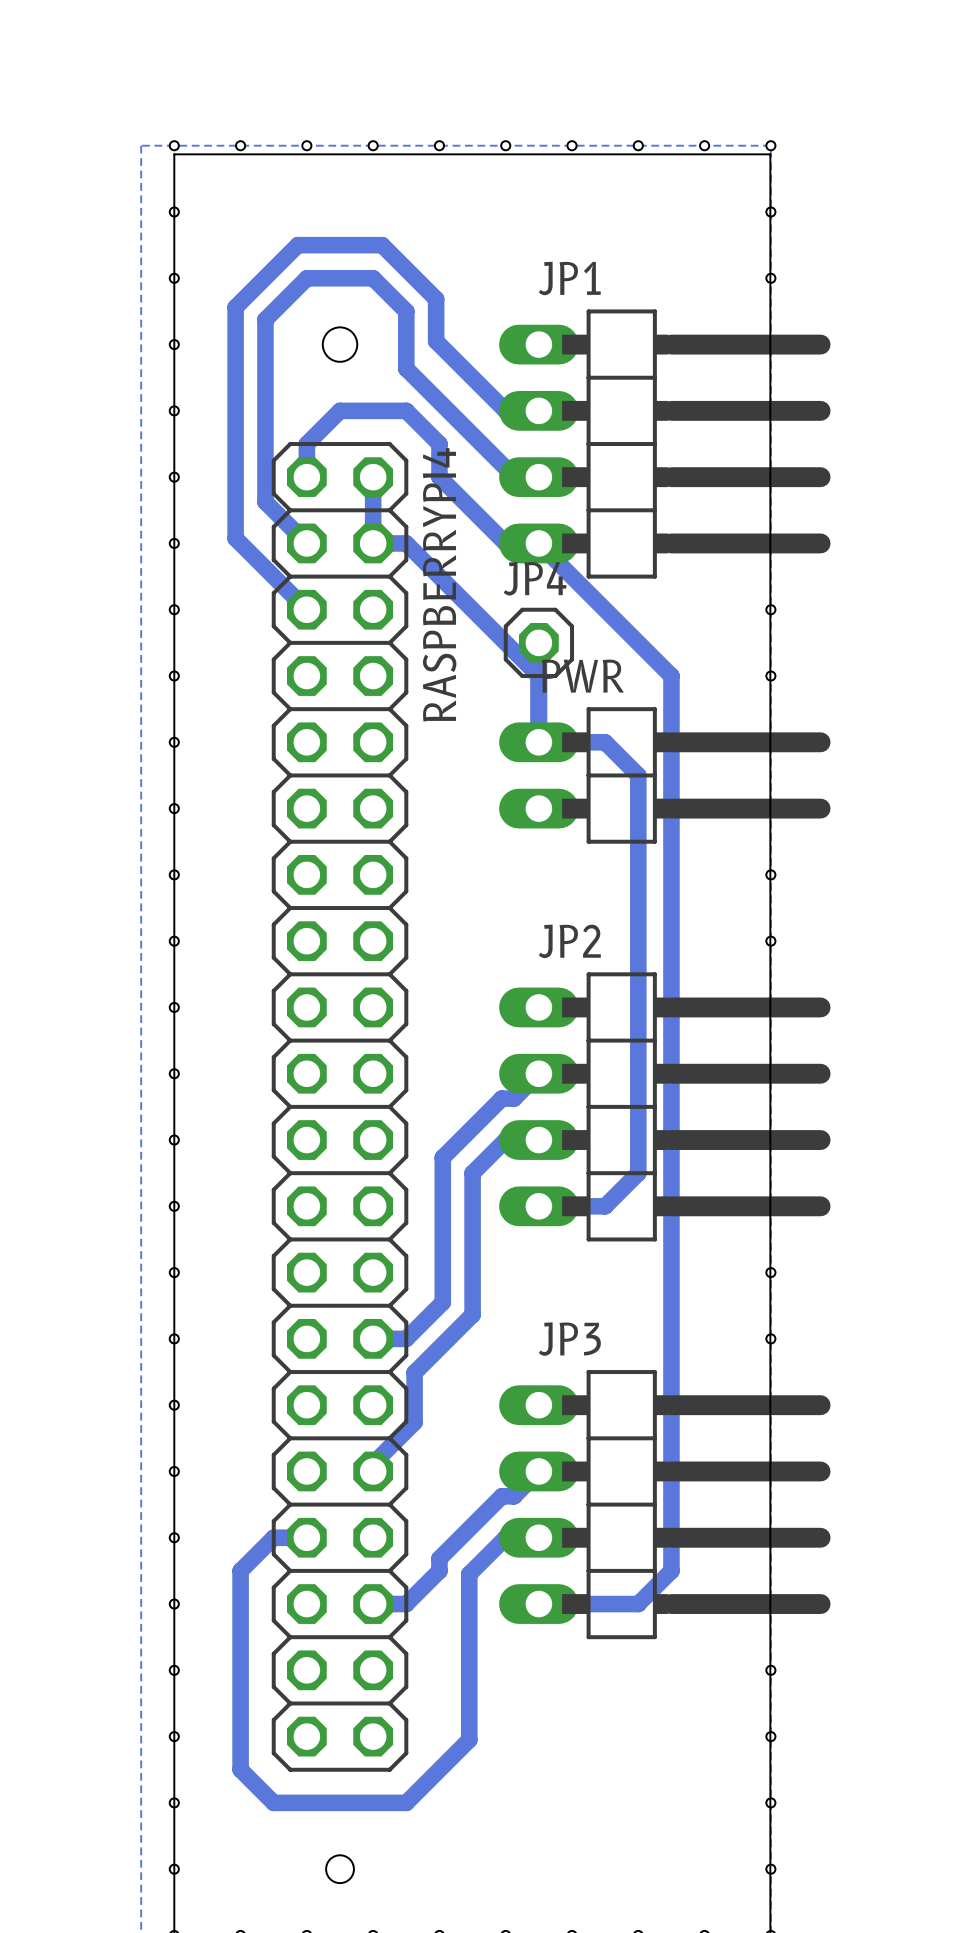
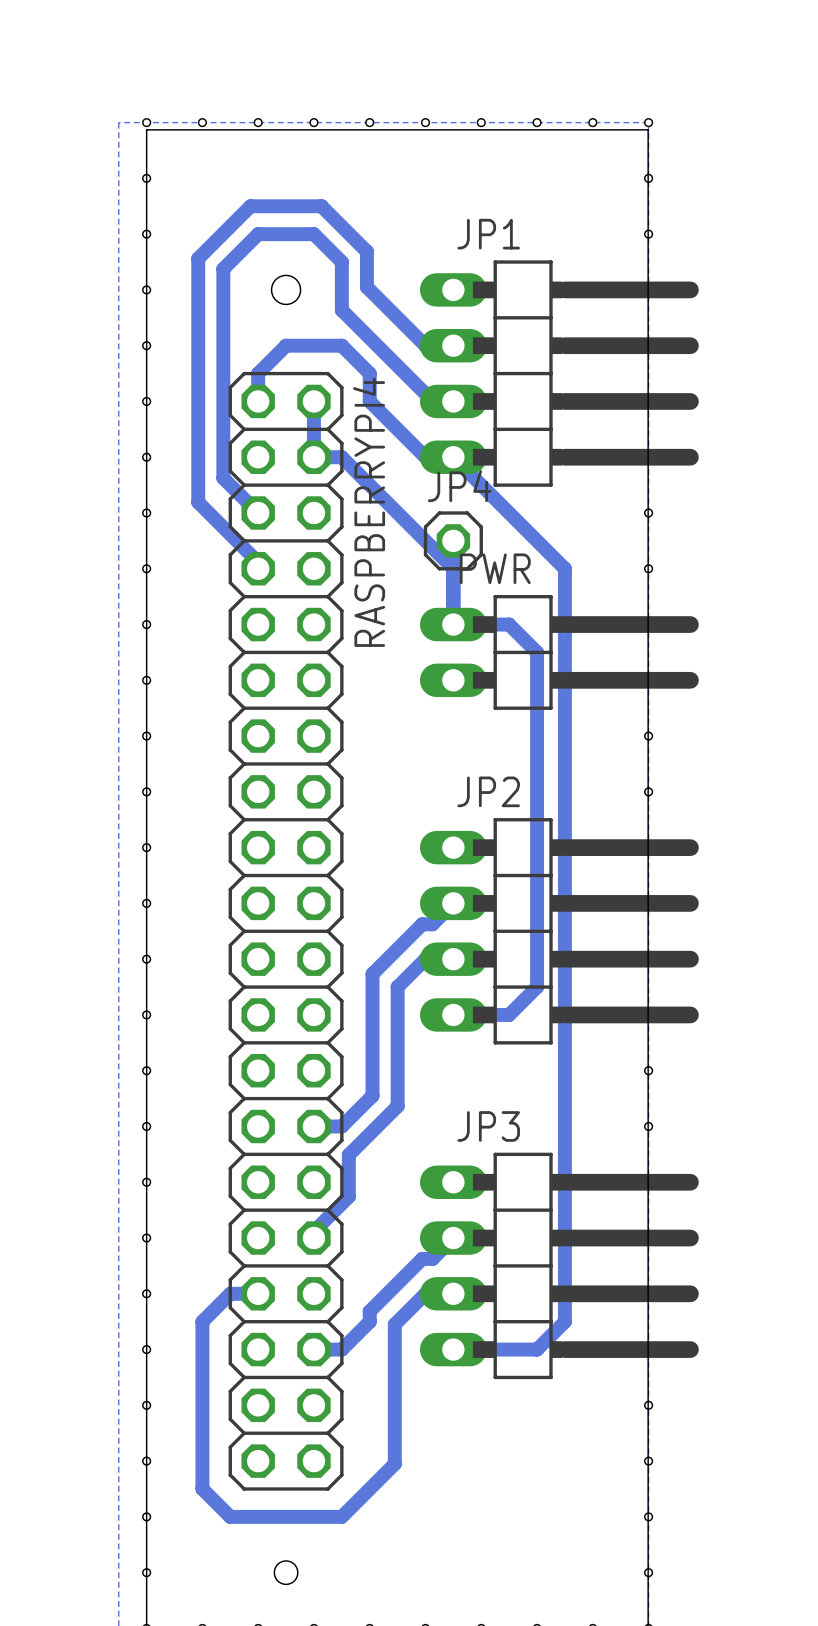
bottom track: (265, 502) (306, 543) -> none
bottom track: (235, 538) (265, 568) -> (223, 422) (223, 478)
bottom track: none -> (198, 453) (198, 502) (258, 562) (258, 568)

